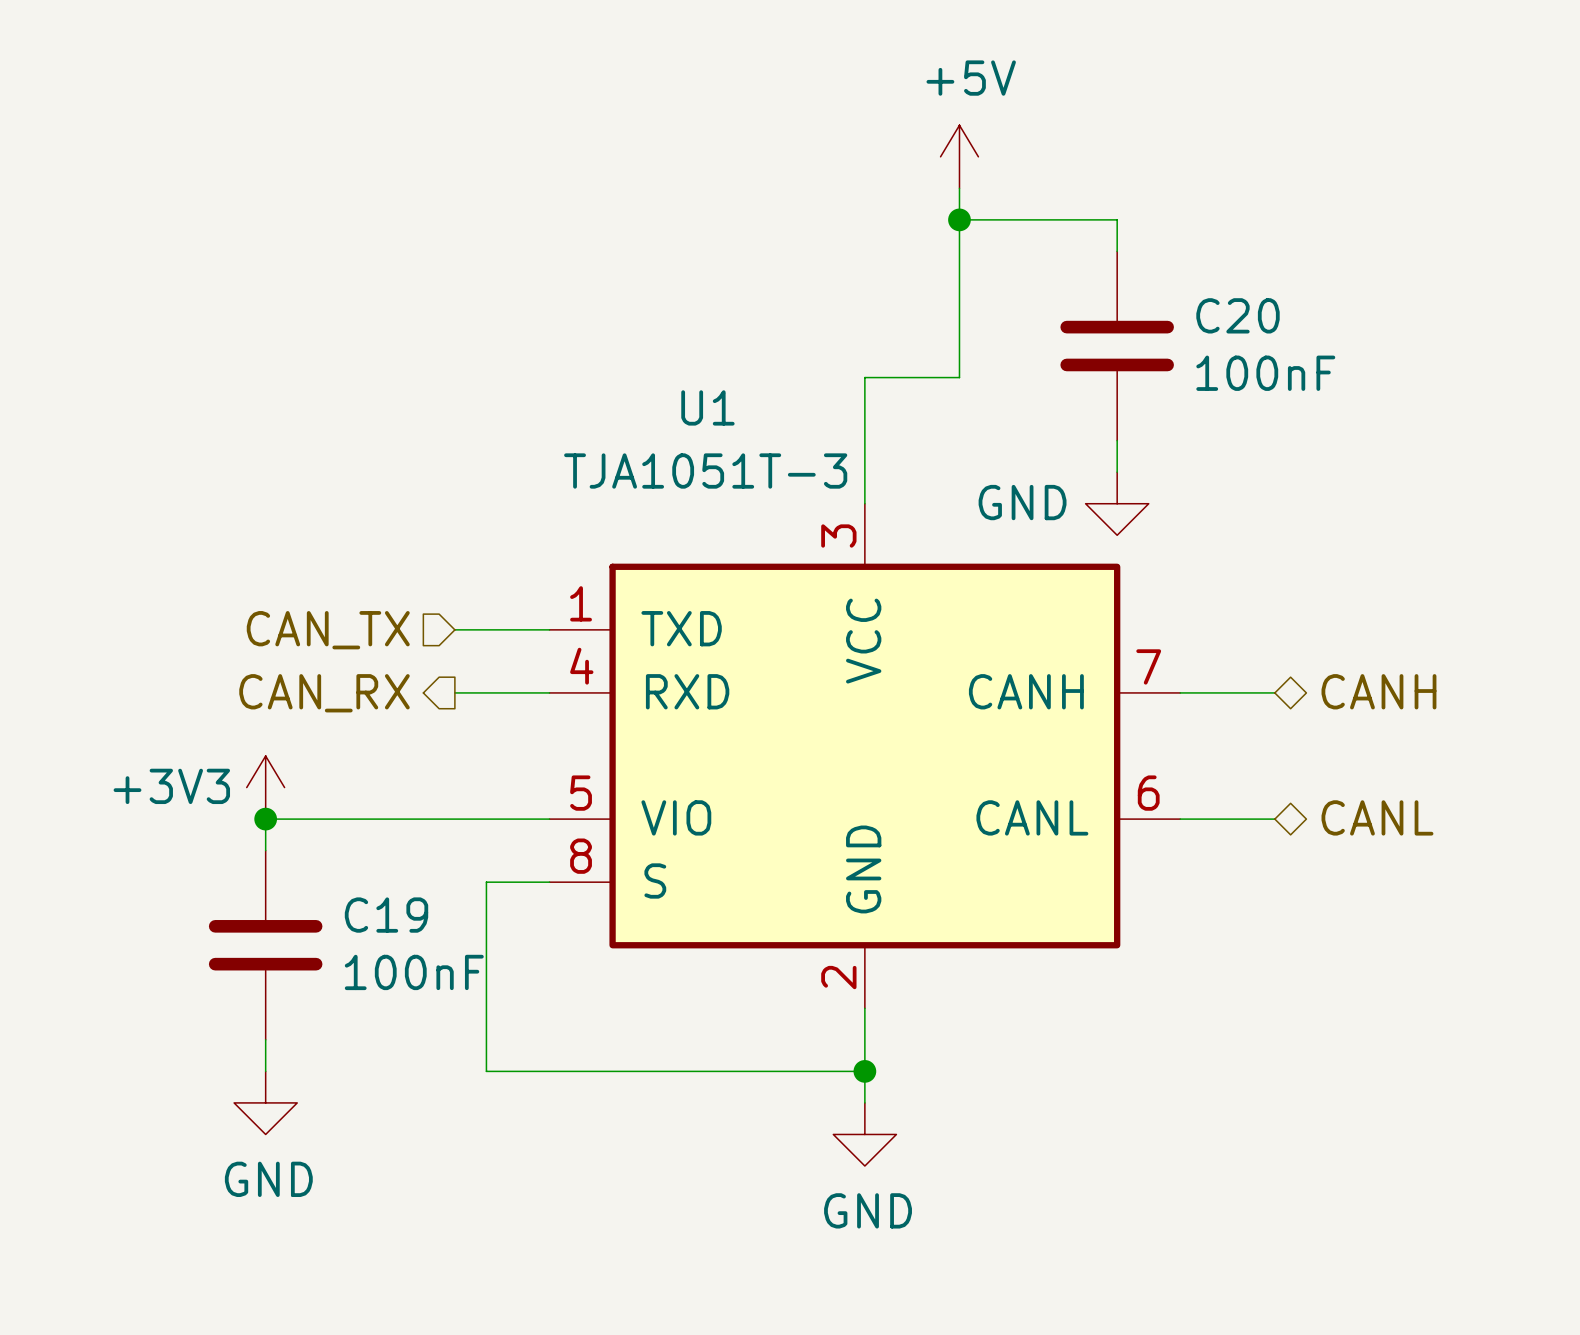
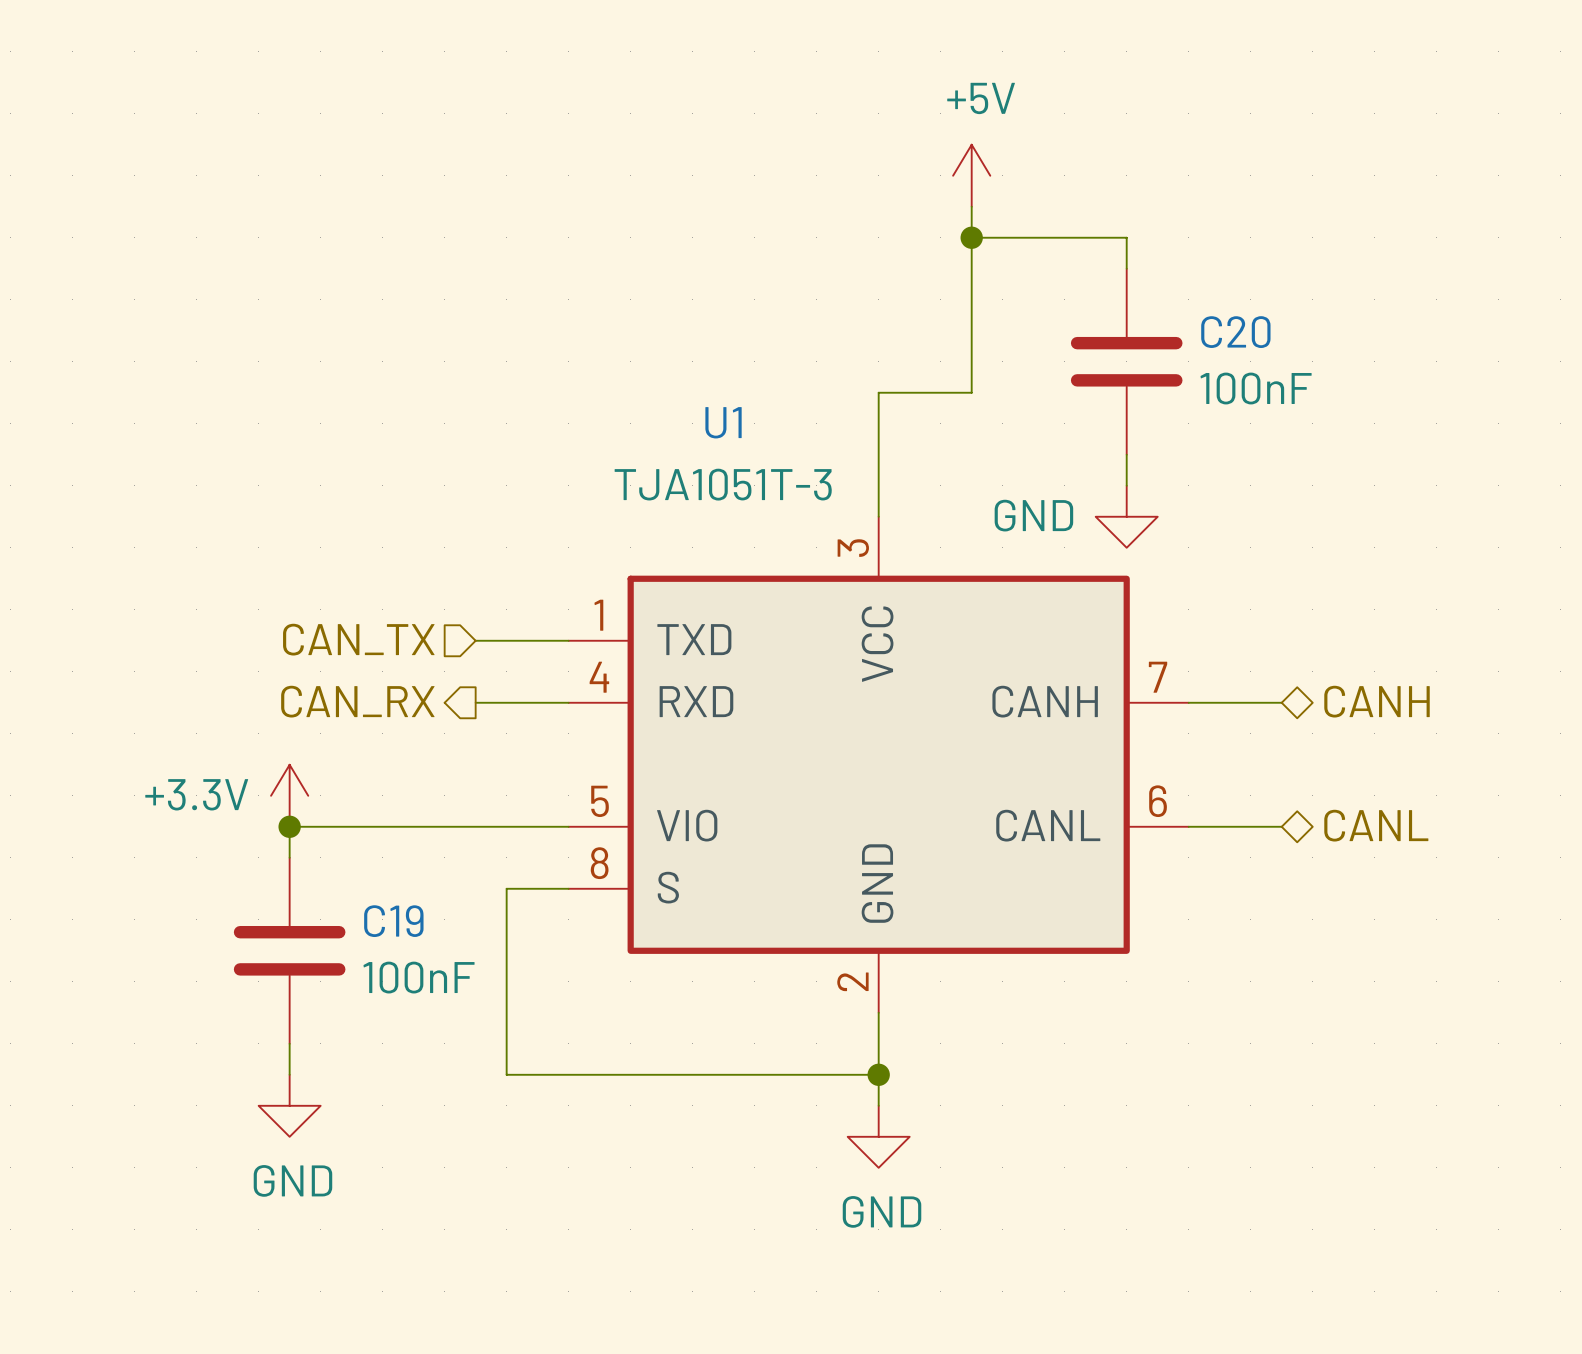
power symbol: +3V3 (265, 787) -> +3.3V (289, 795)

